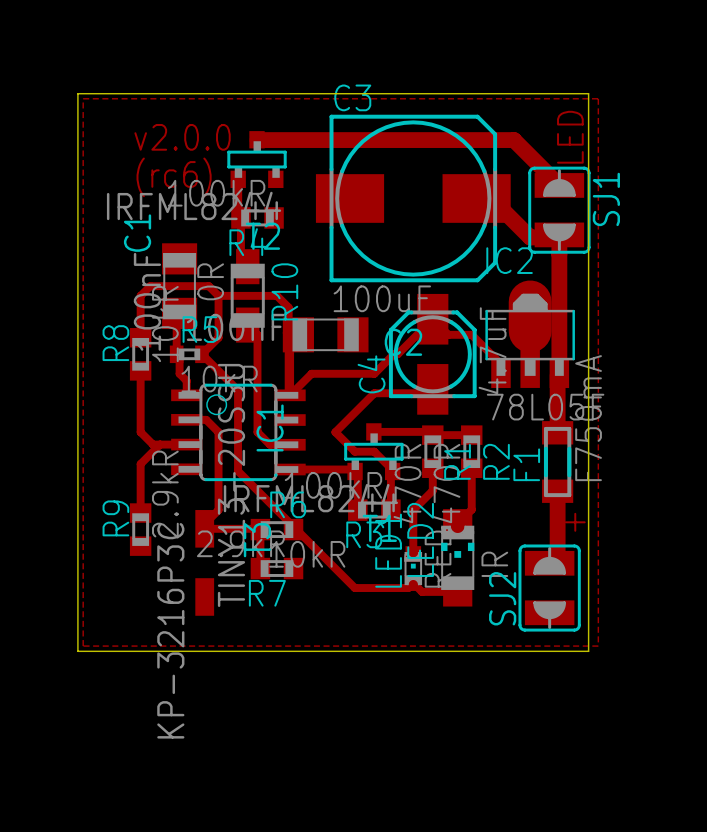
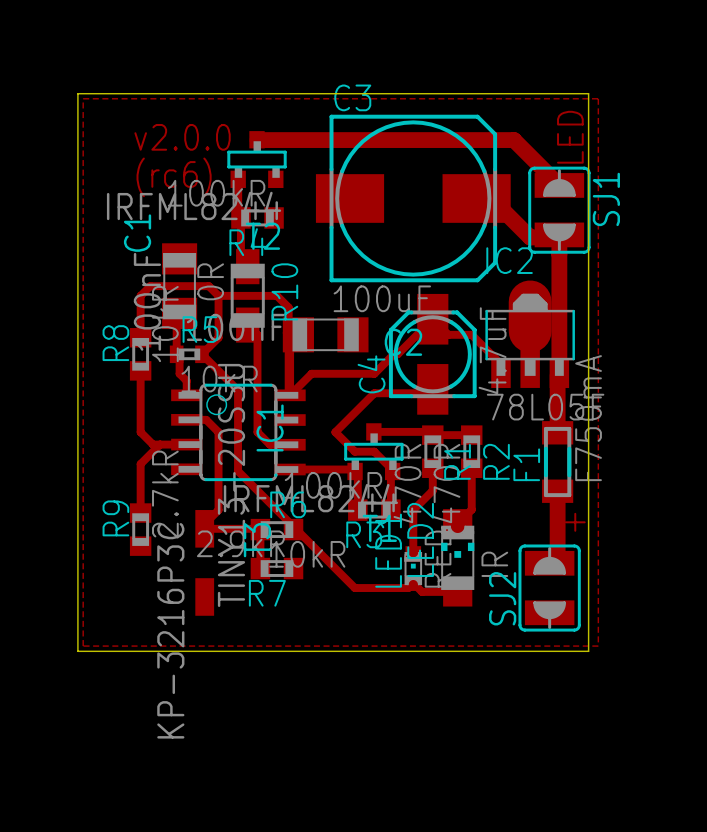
R9 value: 2.9kR (165, 494) -> 2.7kR (165, 494)

